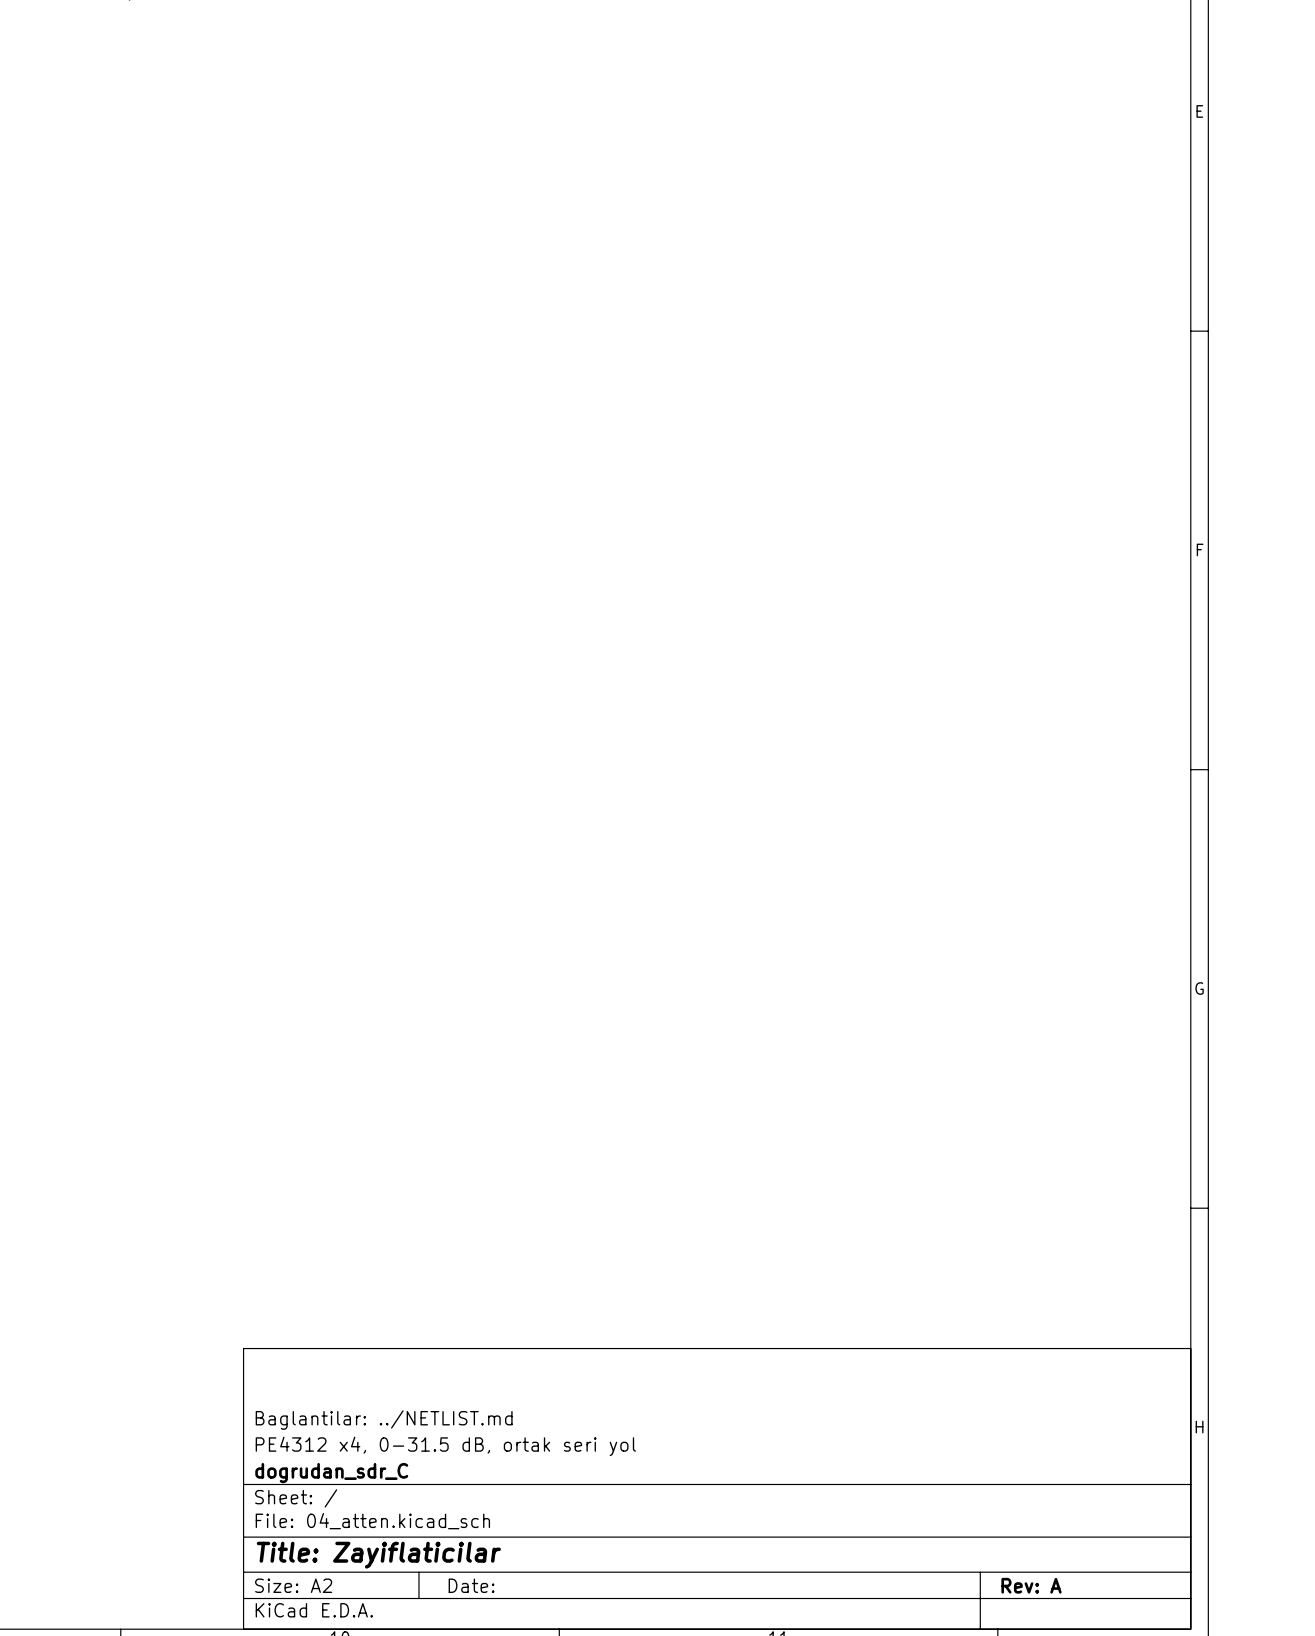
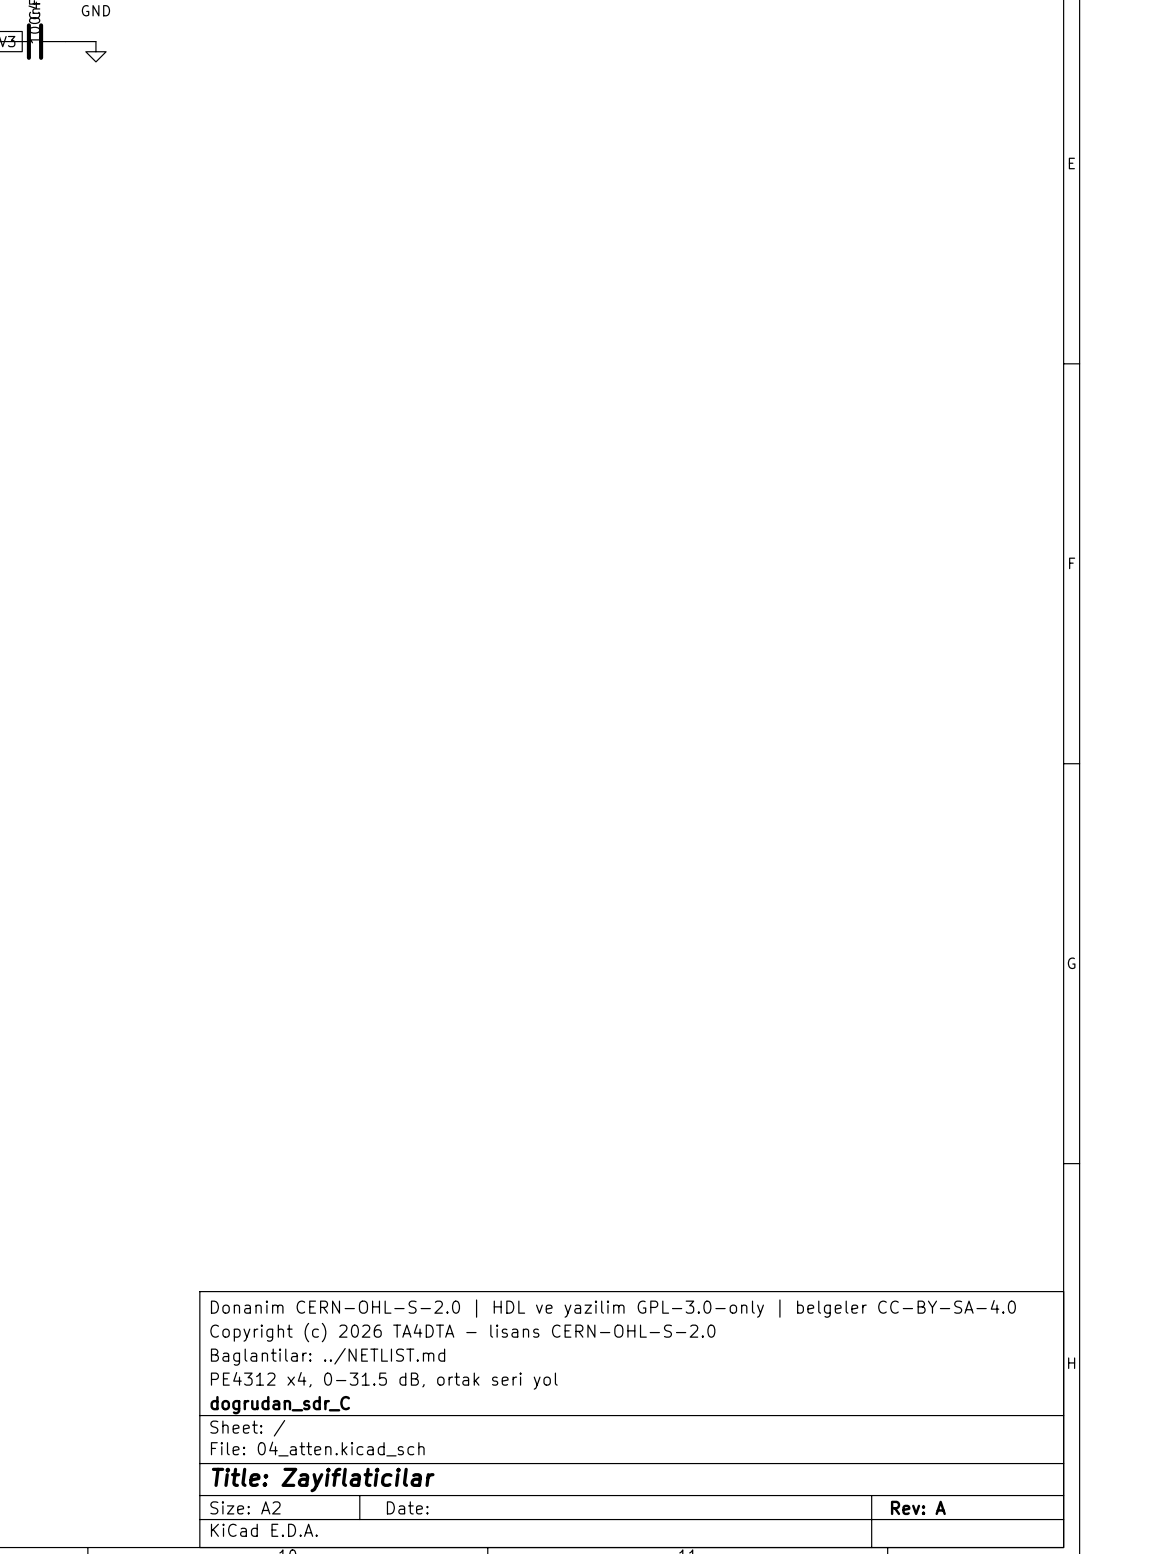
title block: none -> Donanim CERN-OHL-S-2.0 | HDL ve yazilim GPL-3.0-only | belgeler CC-BY-SA-4.0 (613, 1308)
title block: none -> Copyright (c) 2026 TA4DTA - lisans CERN-OHL-S-2.0 (462, 1332)

